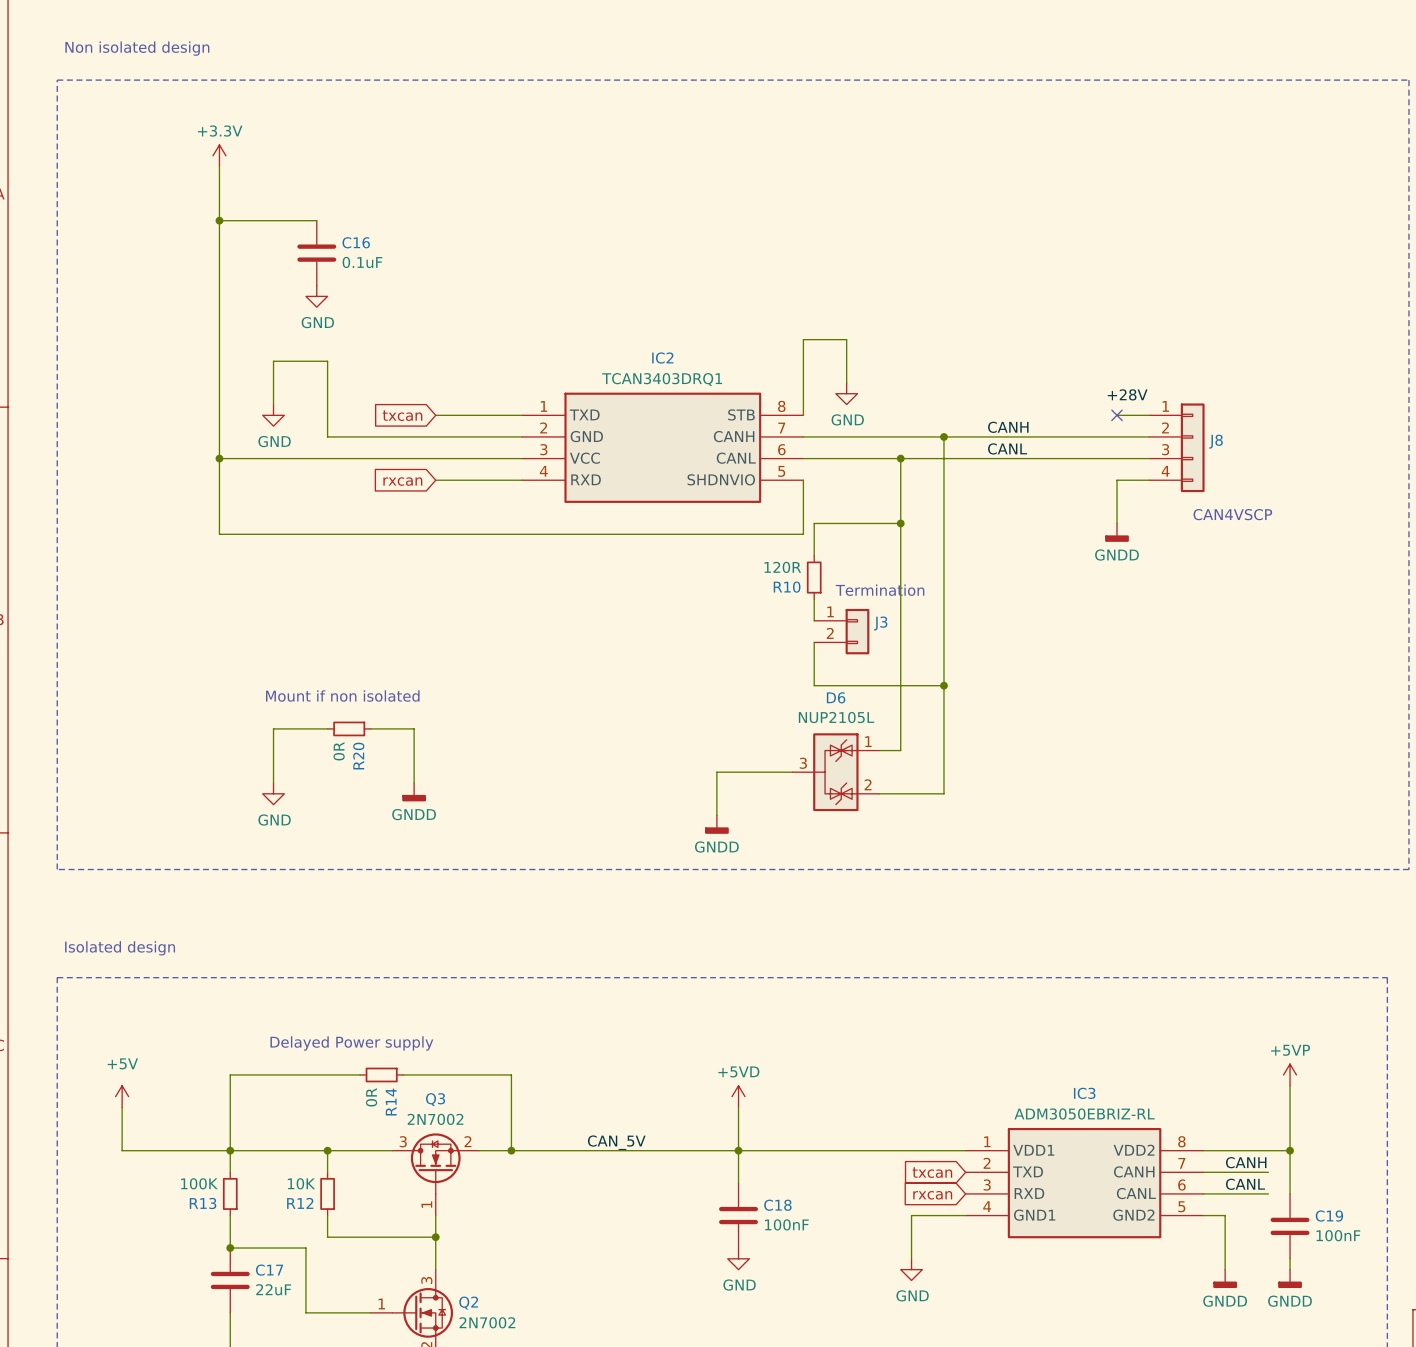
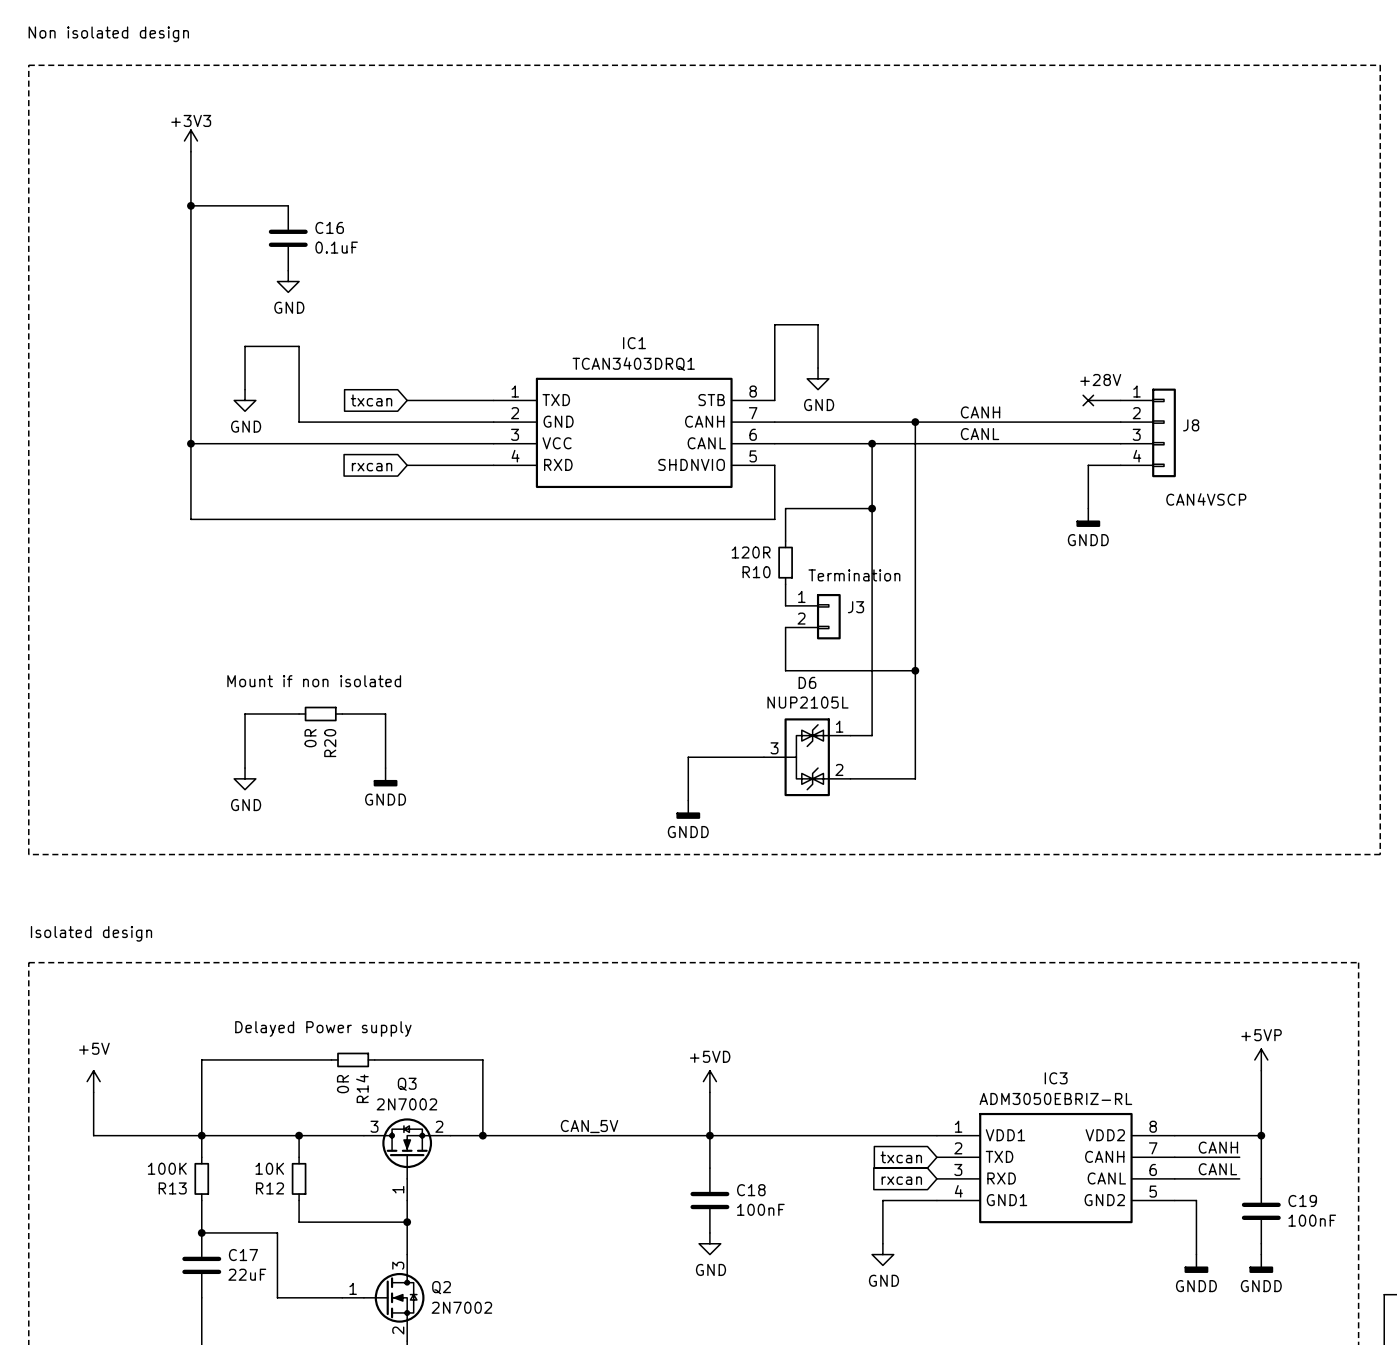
power symbol: +3.3V (219, 155) -> +3V3 (190, 140)
IC2 name: IC2 (662, 358) -> IC1 (634, 343)

